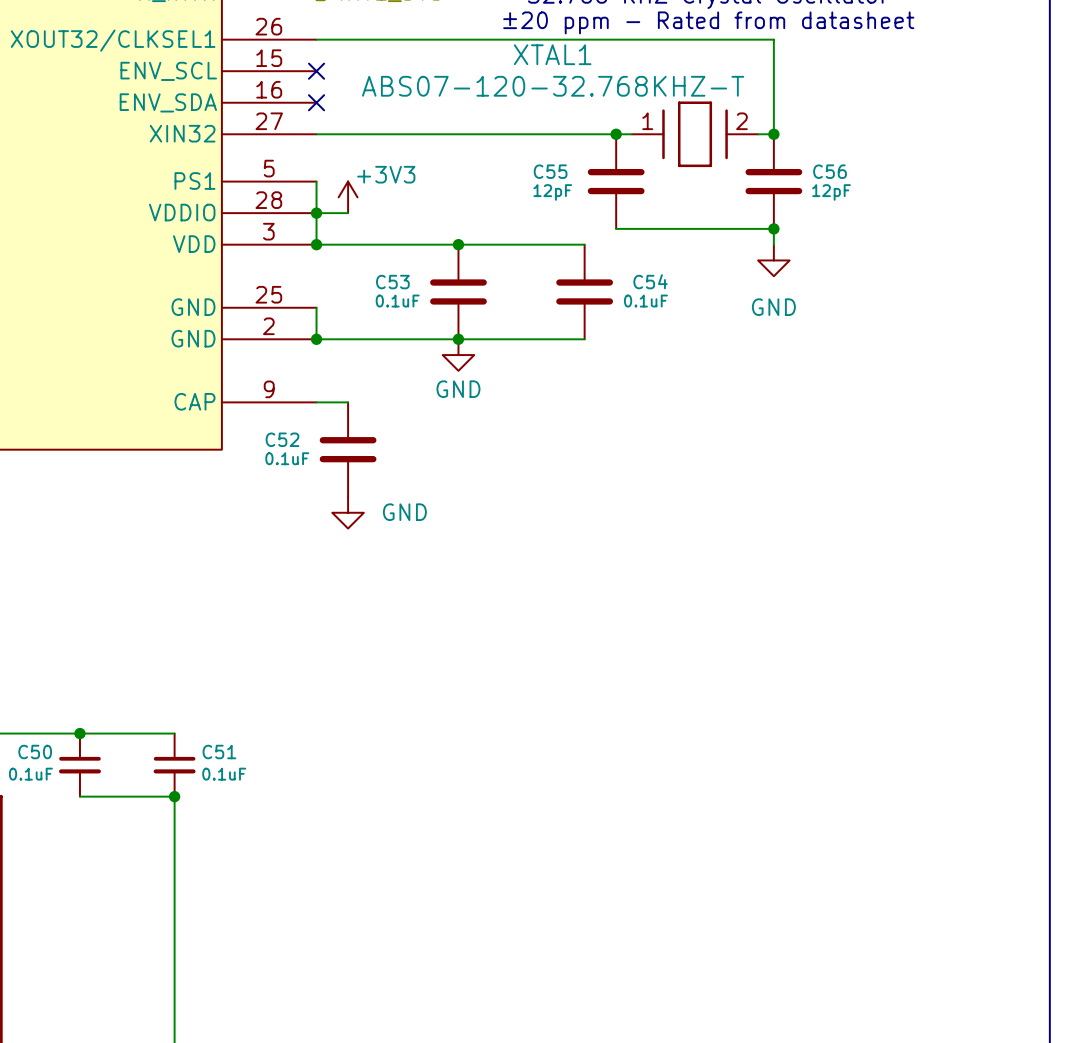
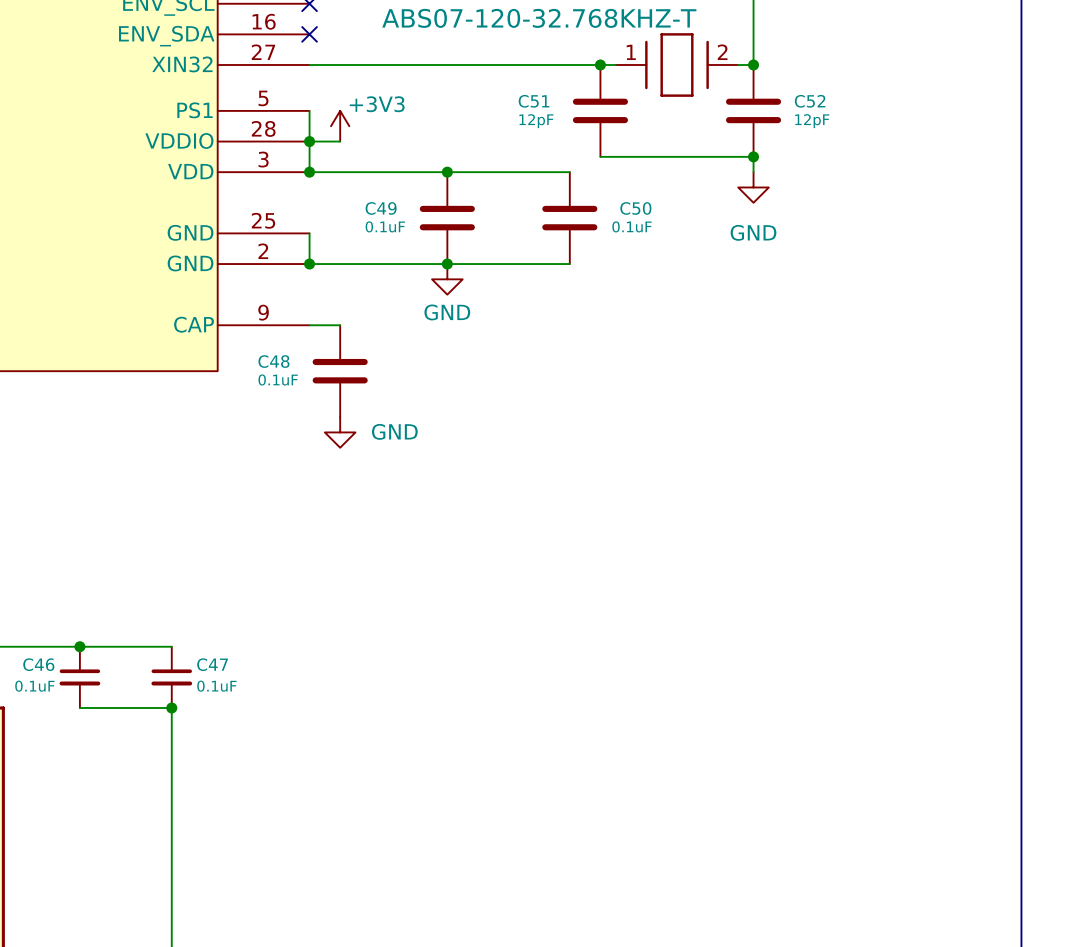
C55 name: C55 (550, 171) -> C51 (534, 101)
C56 name: C56 (830, 171) -> C52 (810, 101)
C54 name: C54 (650, 281) -> C50 (635, 208)
C53 name: C53 (392, 282) -> C49 (381, 208)
C52 name: C52 (282, 439) -> C48 (273, 361)
C50 name: C50 (35, 752) -> C46 (38, 664)
C51 name: C51 (219, 752) -> C47 (212, 664)

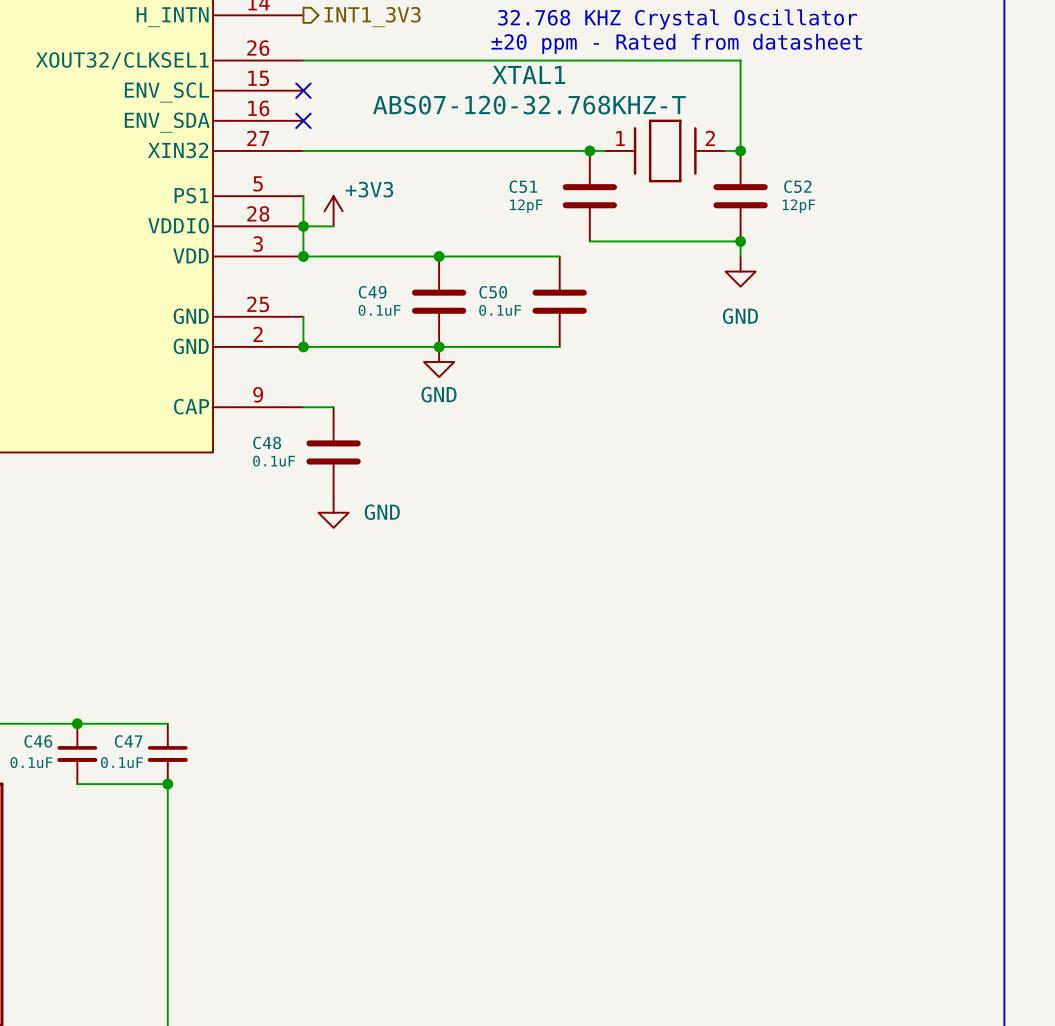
C50 name position: C50 (635, 208) -> C50 (493, 292)
C50 value position: 0.1uF (631, 226) -> 0.1uF (500, 310)
C47 name position: C47 (212, 664) -> C47 (128, 741)
C47 value position: 0.1uF (216, 686) -> 0.1uF (121, 762)

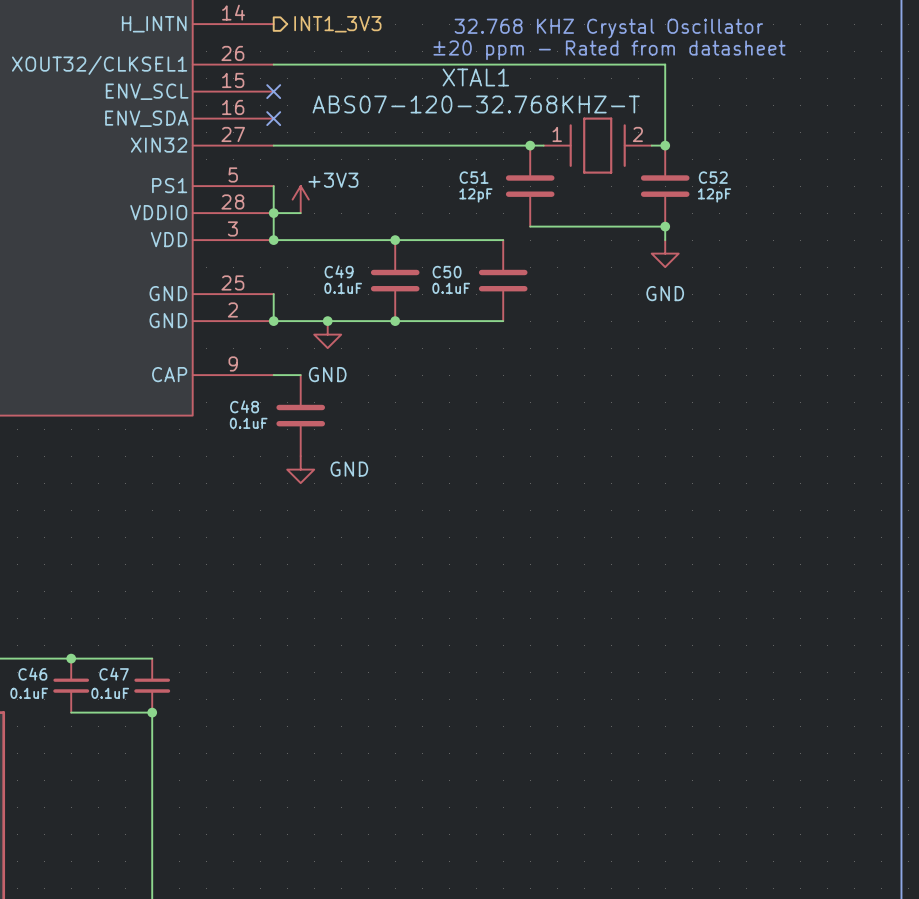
junction: none -> (327, 321)
power symbol position: GND (439, 362) -> GND (327, 334)
power symbol text position: GND (438, 394) -> GND (327, 374)

